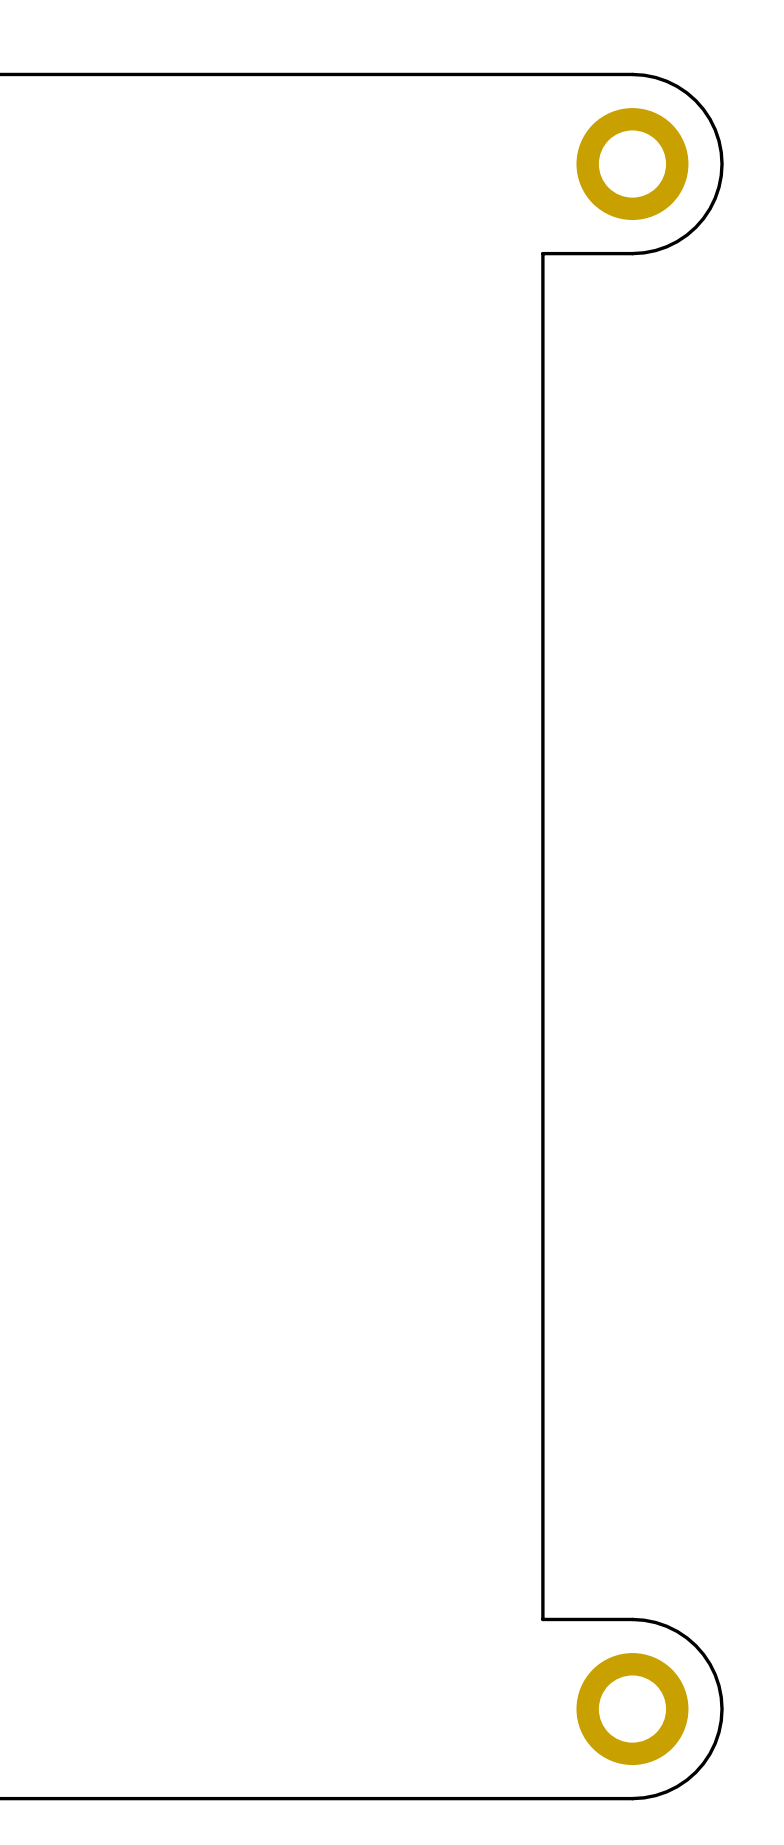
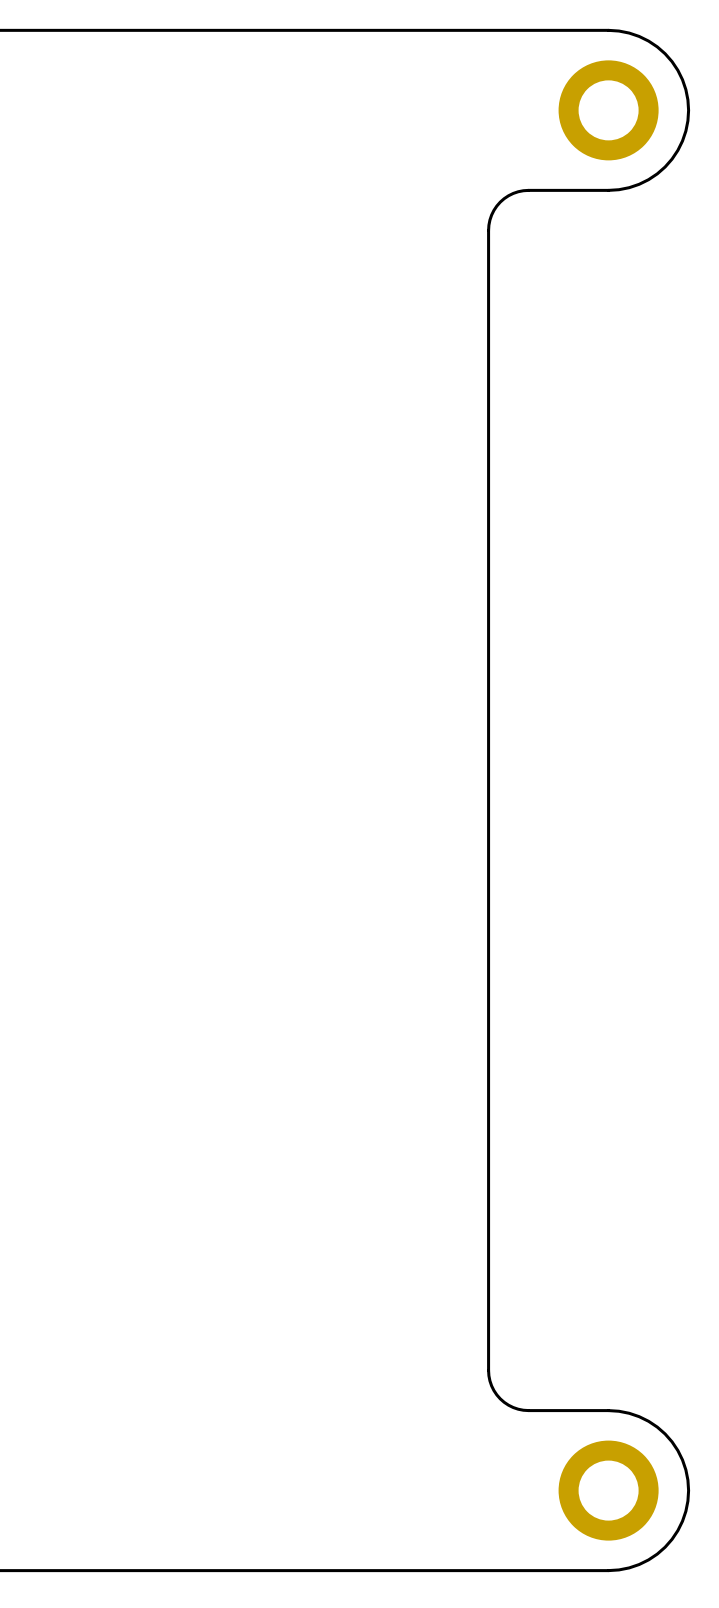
board edge: (542, 253) (542, 1619) -> (528, 190) (513, 193) (500, 202) (491, 215) (488, 230) (488, 1370) (491, 1385) (500, 1398) (513, 1407) (528, 1410)

